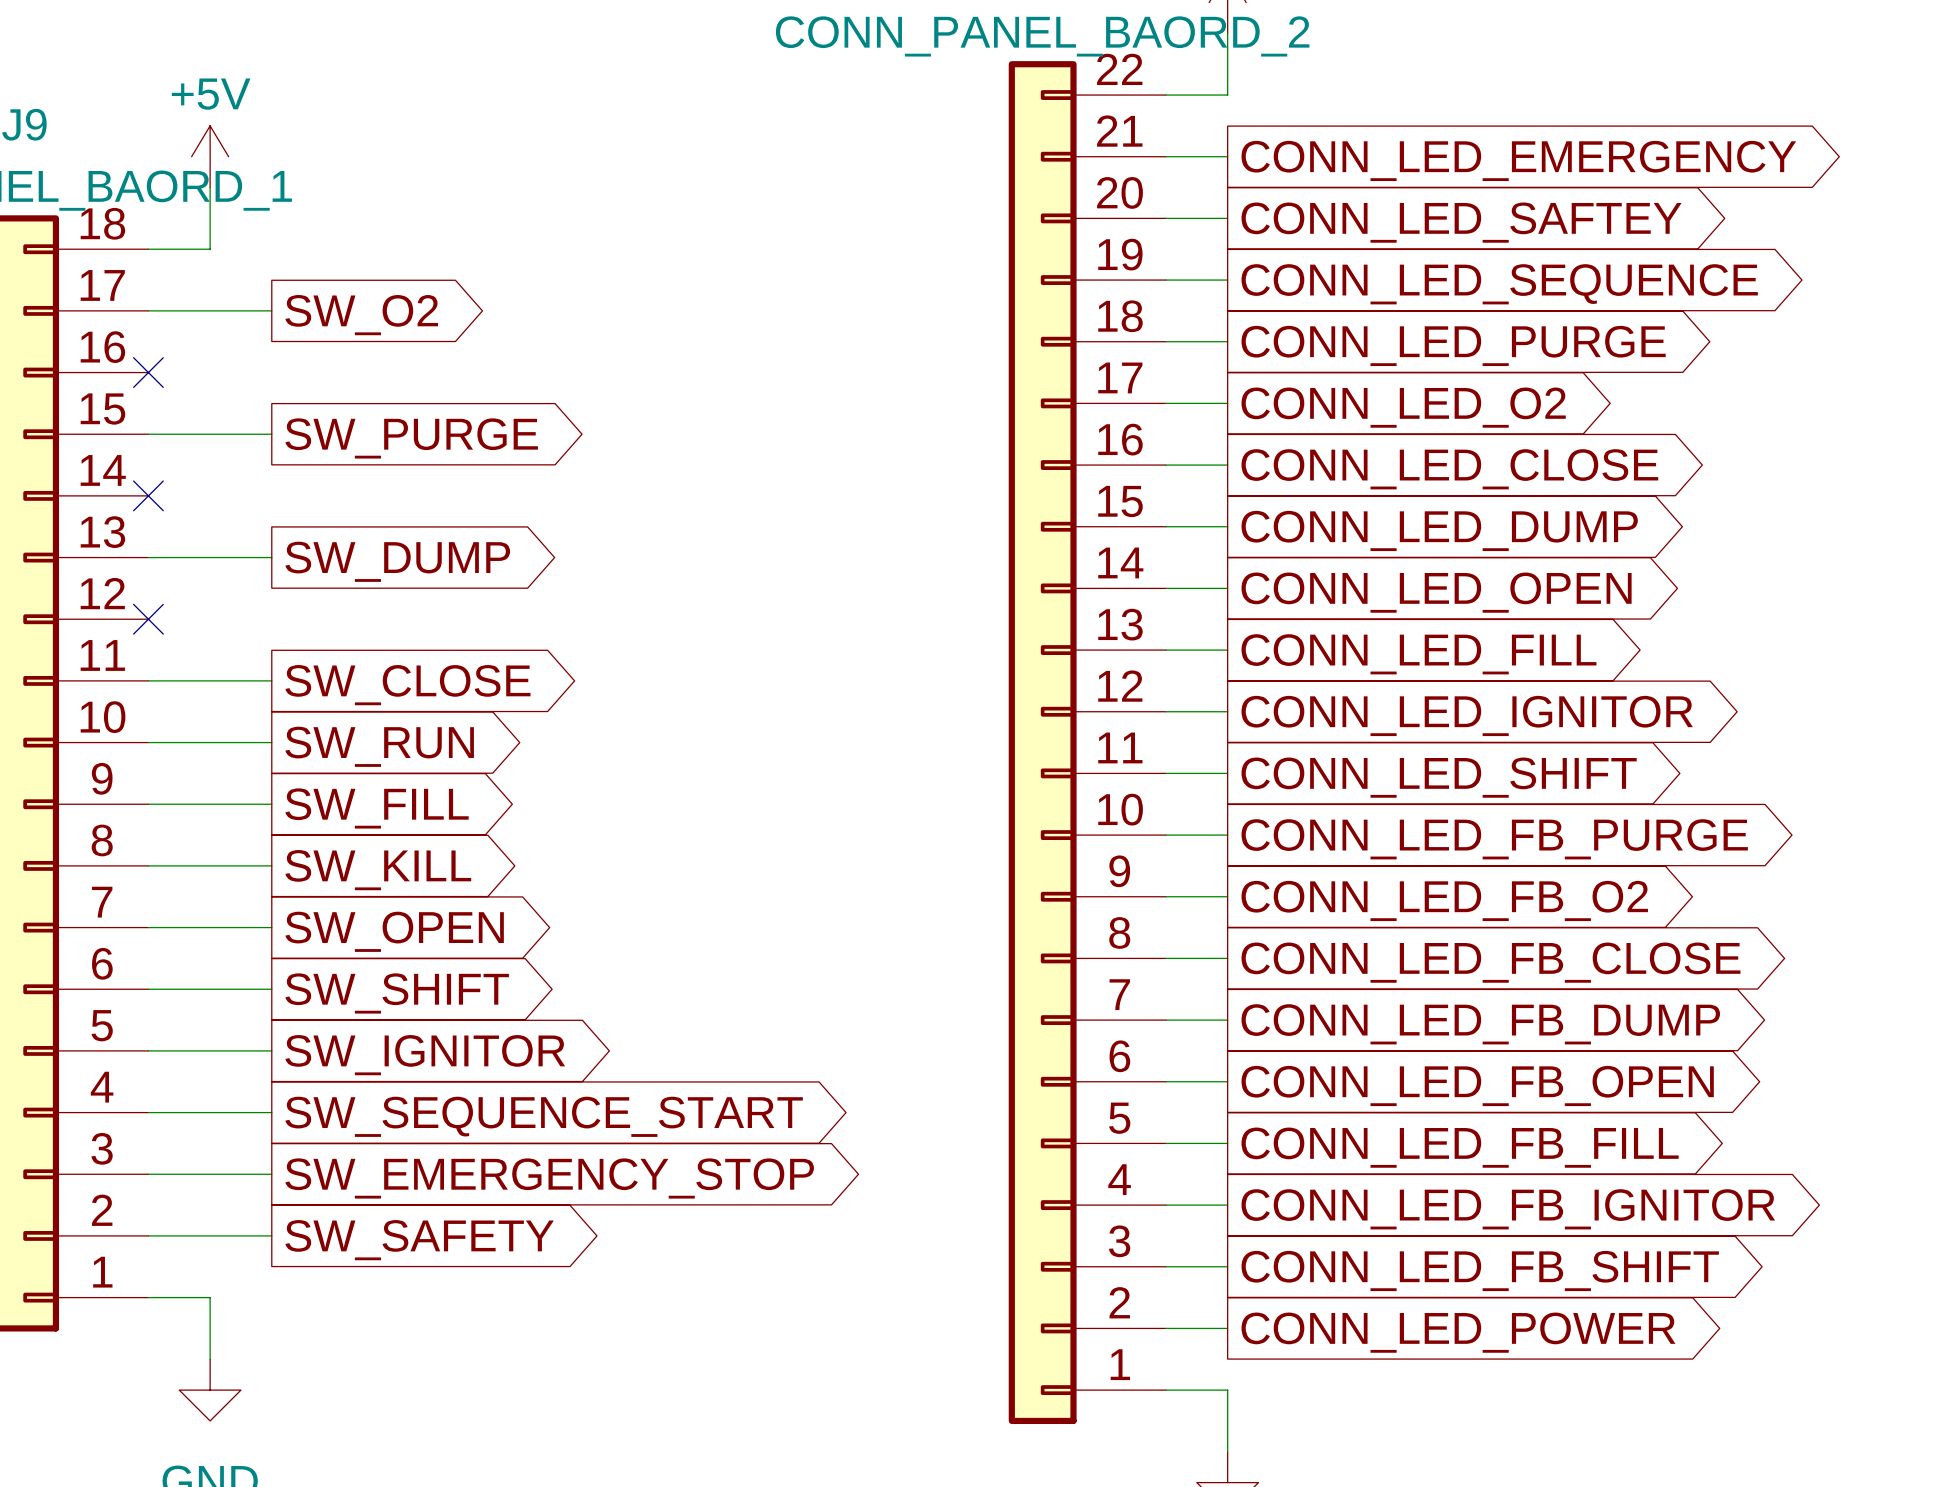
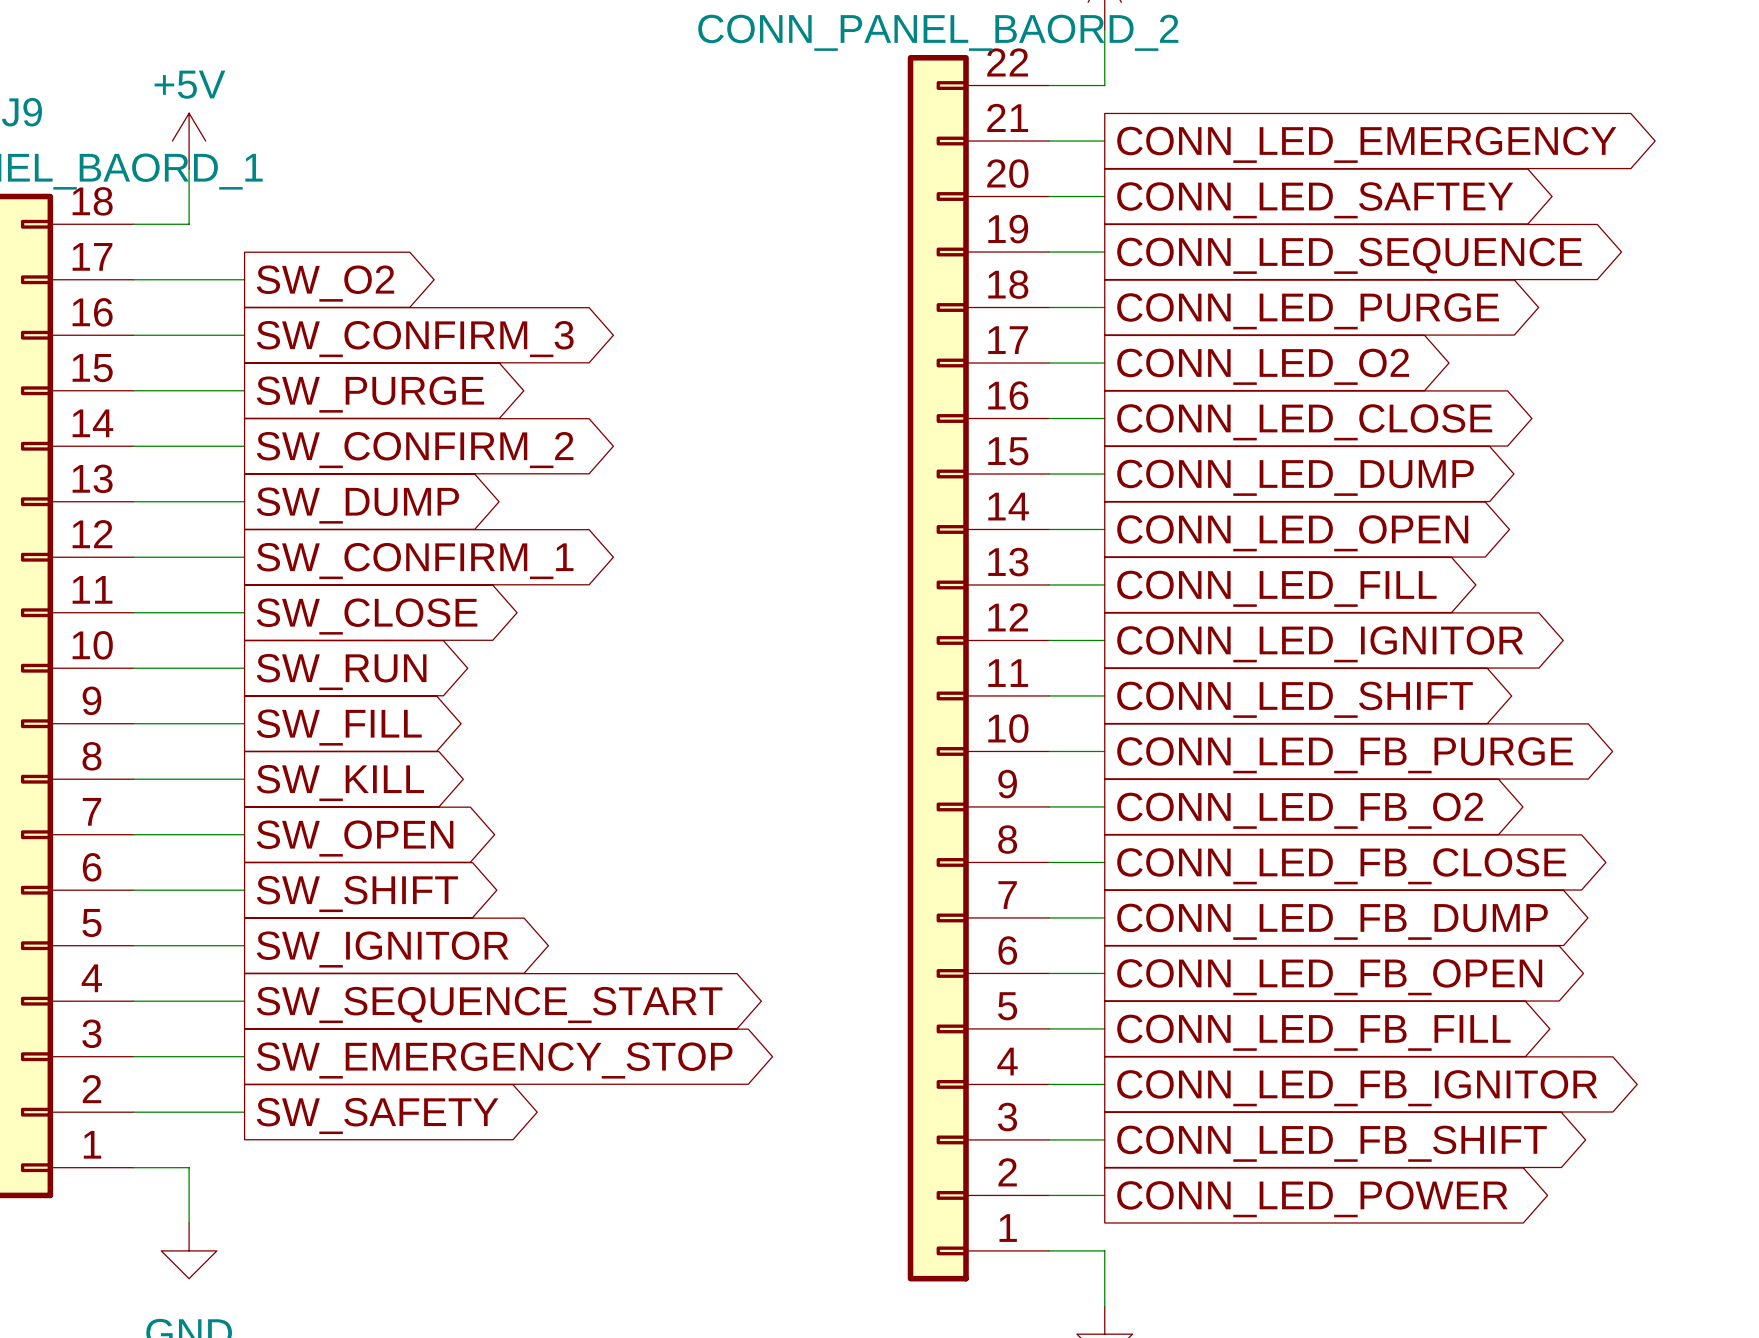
wire: none -> (133, 335) (244, 335)
no-connect mark: (148, 372) -> none
global label: none -> SW_CONFIRM_3 (415, 339)
wire: none -> (133, 446) (244, 446)
no-connect mark: (148, 495) -> none
global label: none -> SW_CONFIRM_2 (415, 450)
wire: none -> (133, 557) (244, 557)
no-connect mark: (148, 619) -> none
global label: none -> SW_CONFIRM_1 (415, 561)

